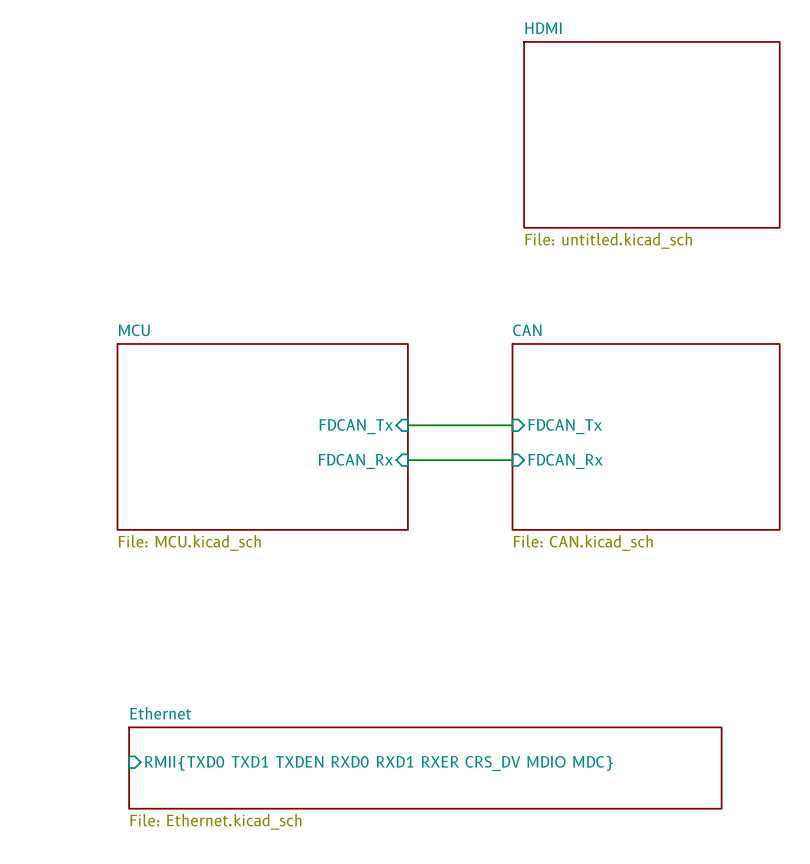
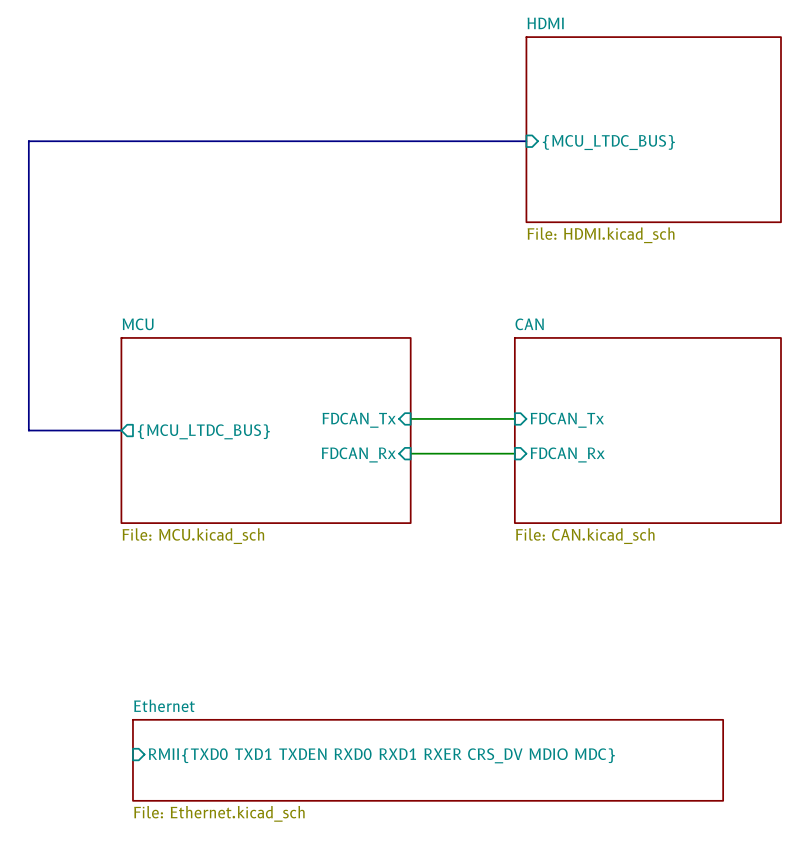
bus: none -> (526, 141) (28, 141) (28, 430) (121, 430)
sheet pin: none -> {MCU_LTDC_BUS} (608, 142)
sheet HDMI value: File: untitled.kicad_sch (608, 240) -> File: HDMI.kicad_sch (601, 235)
sheet pin: none -> {MCU_LTDC_BUS} (203, 431)

